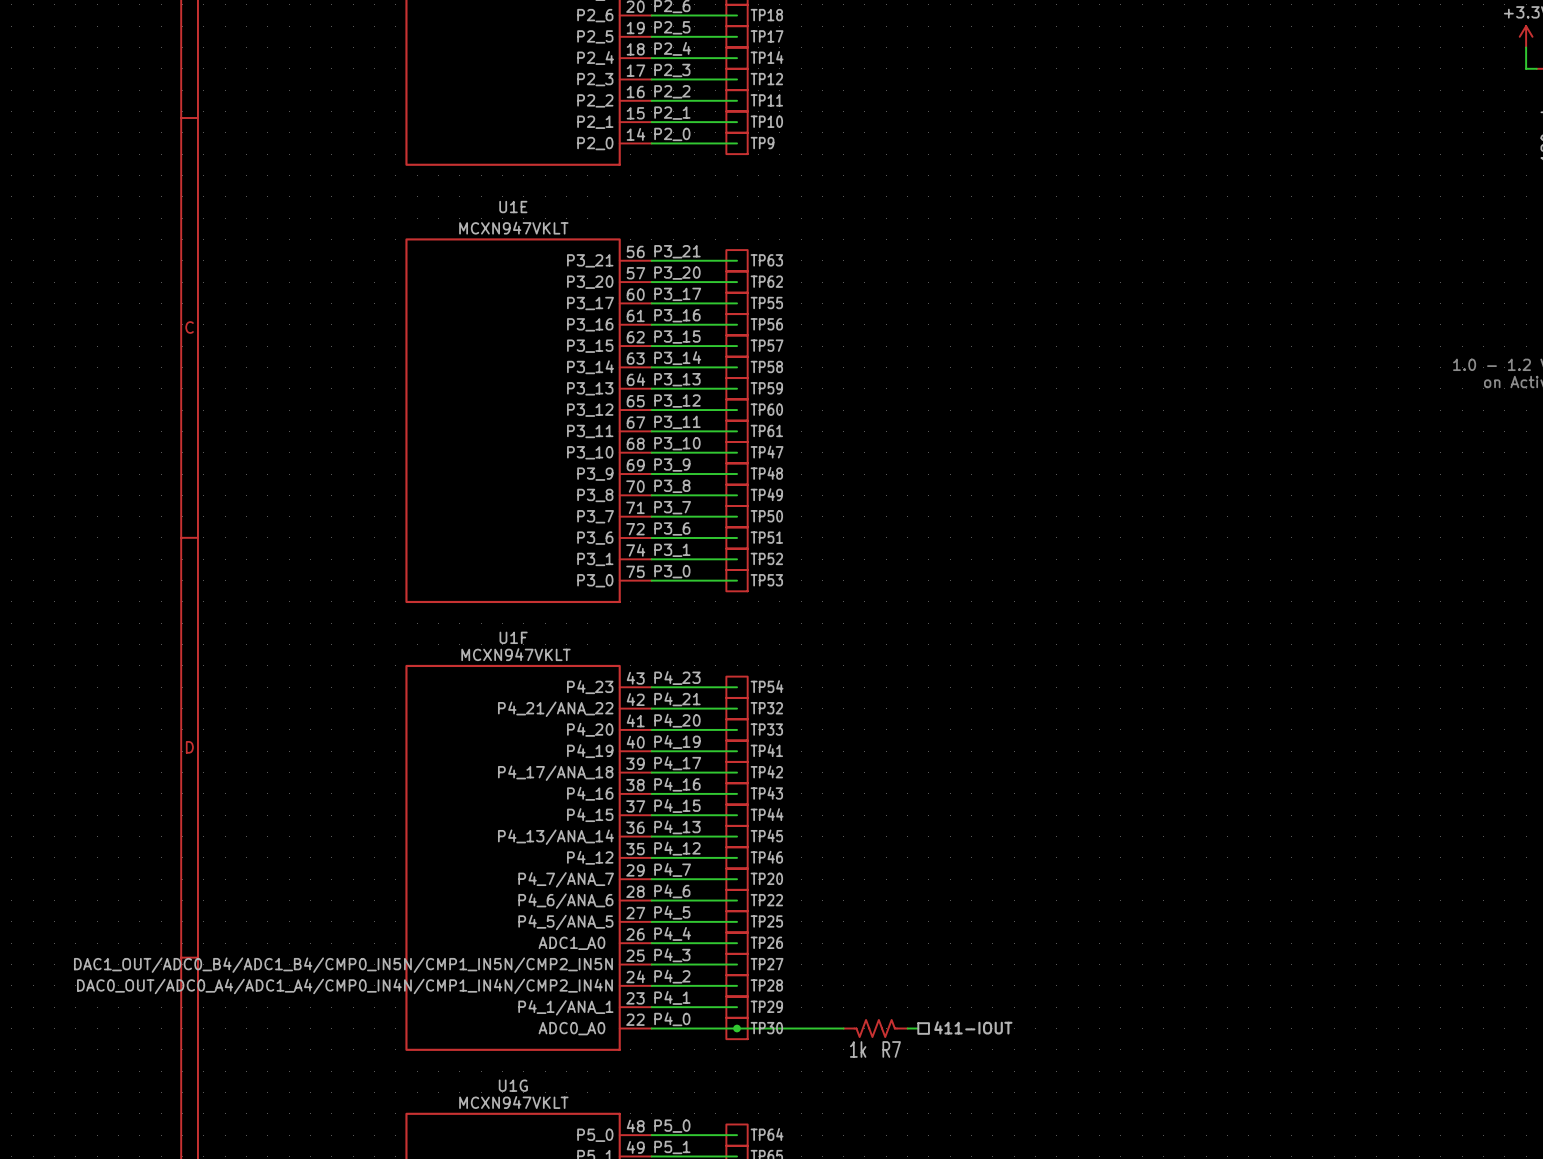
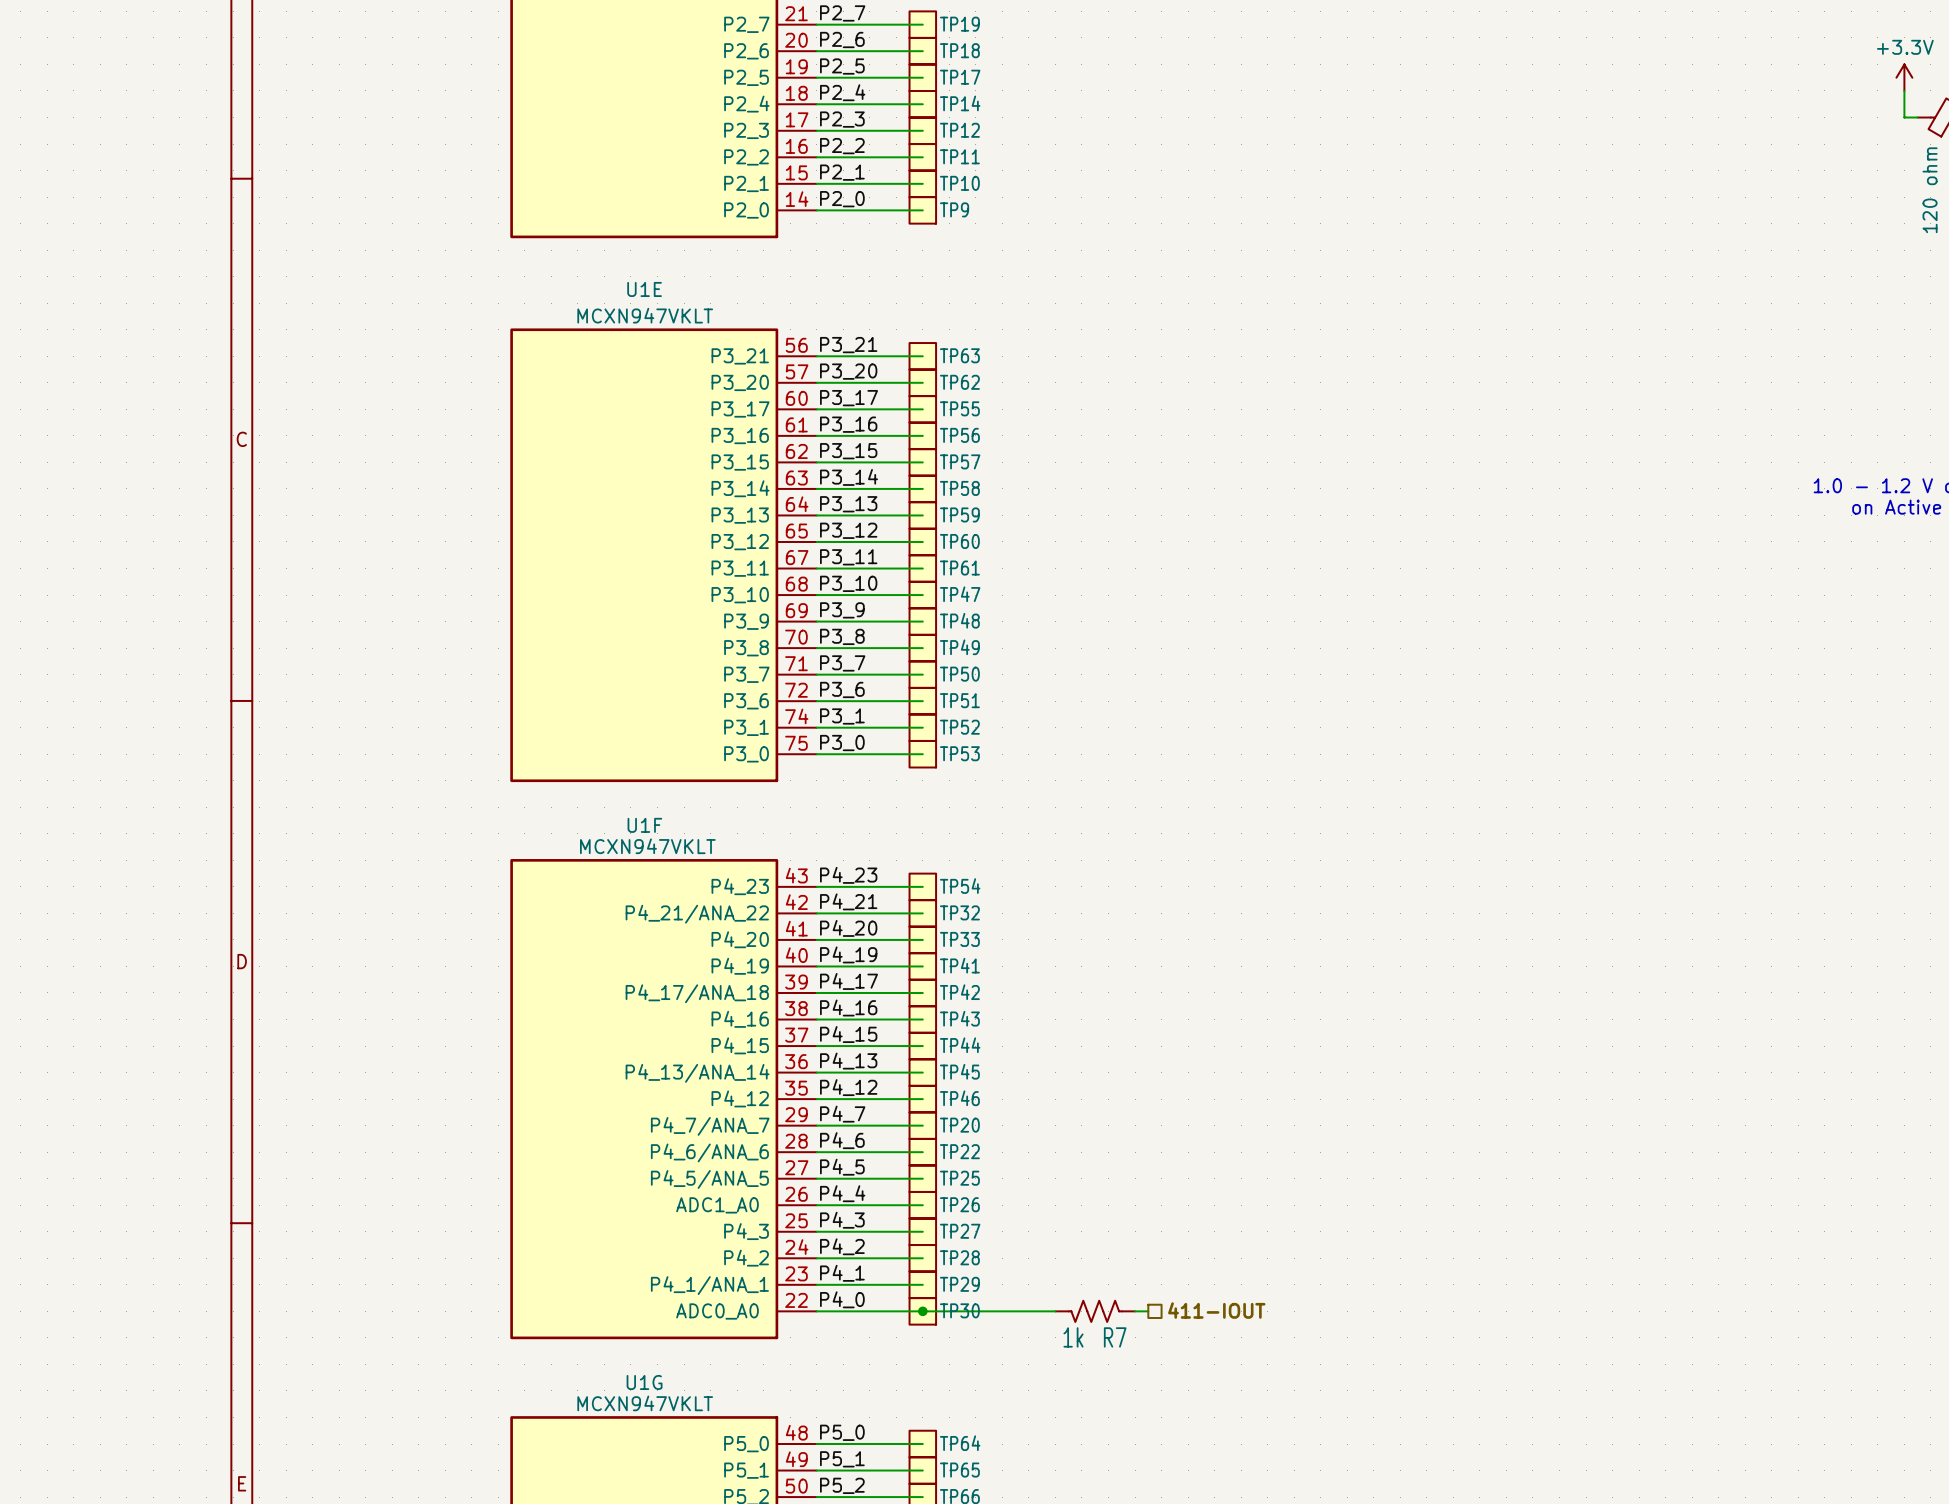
U1F pin name: DAC1_OUT/ADC0_B4/ADC1_B4/CMP0_IN5N/CMP1_IN5N/CMP2_IN5N (343, 965) -> P4_3 (746, 1231)
U1F pin name: DAC0_OUT/ADC0_A4/ADC1_A4/CMP0_IN4N/CMP1_IN4N/CMP2_IN4N (344, 986) -> P4_2 (746, 1258)

